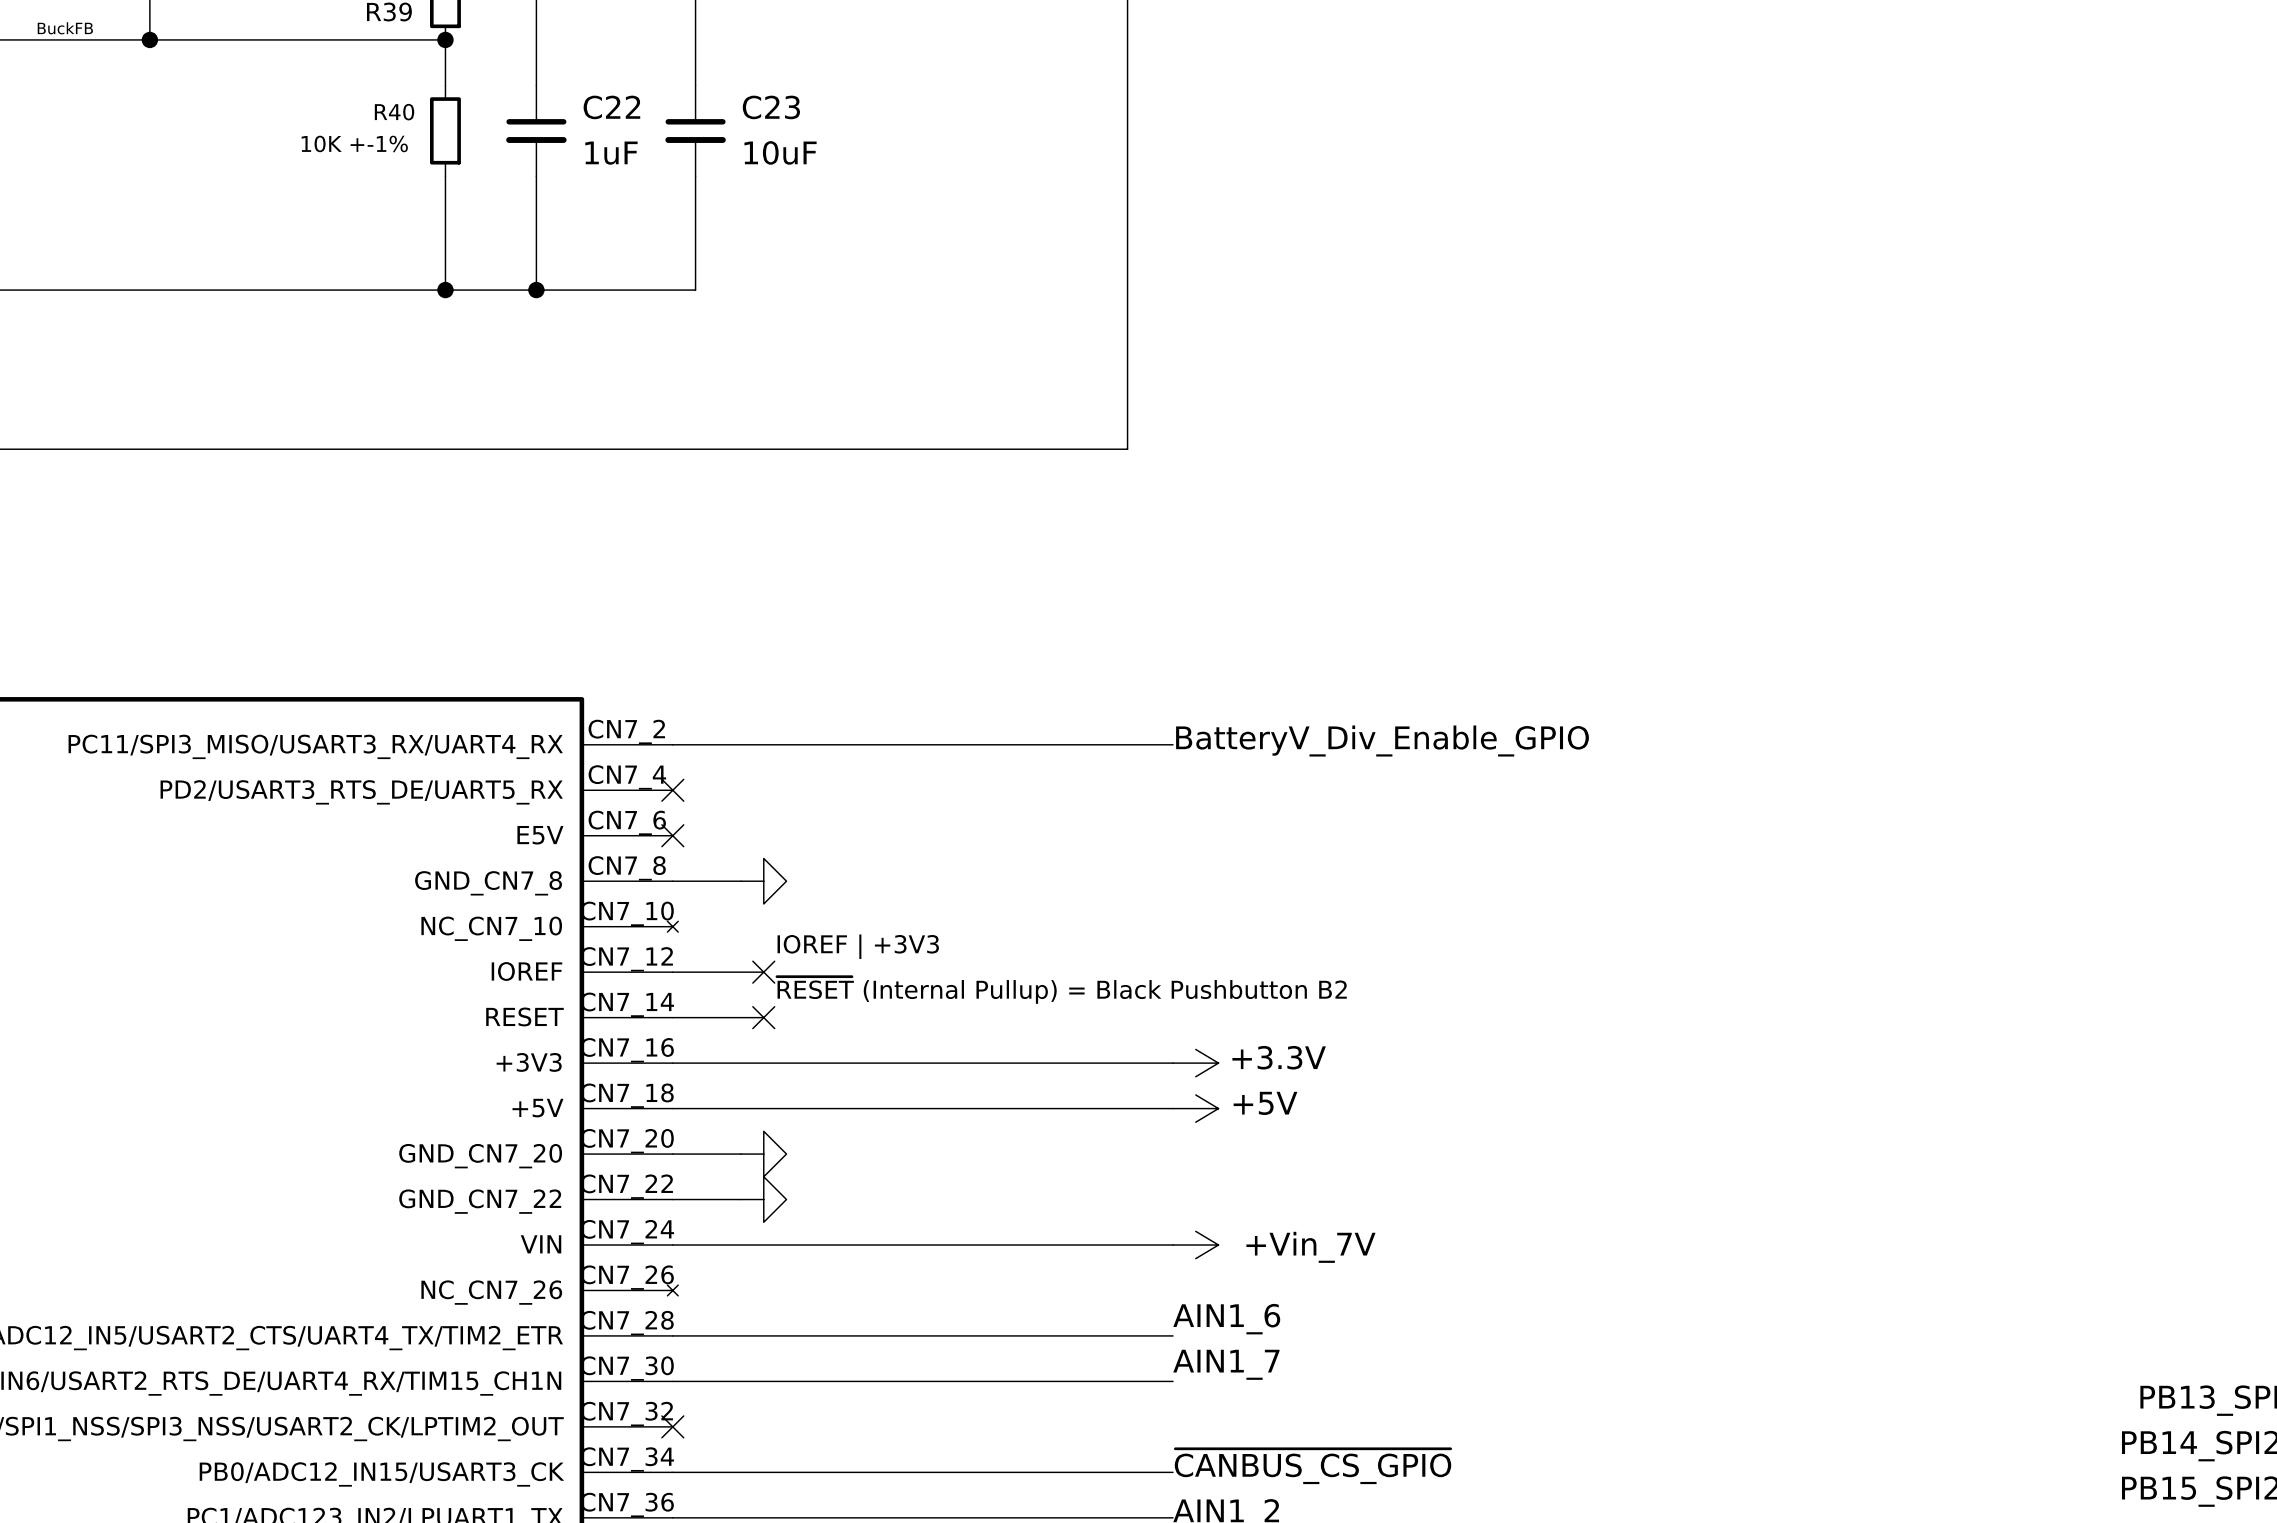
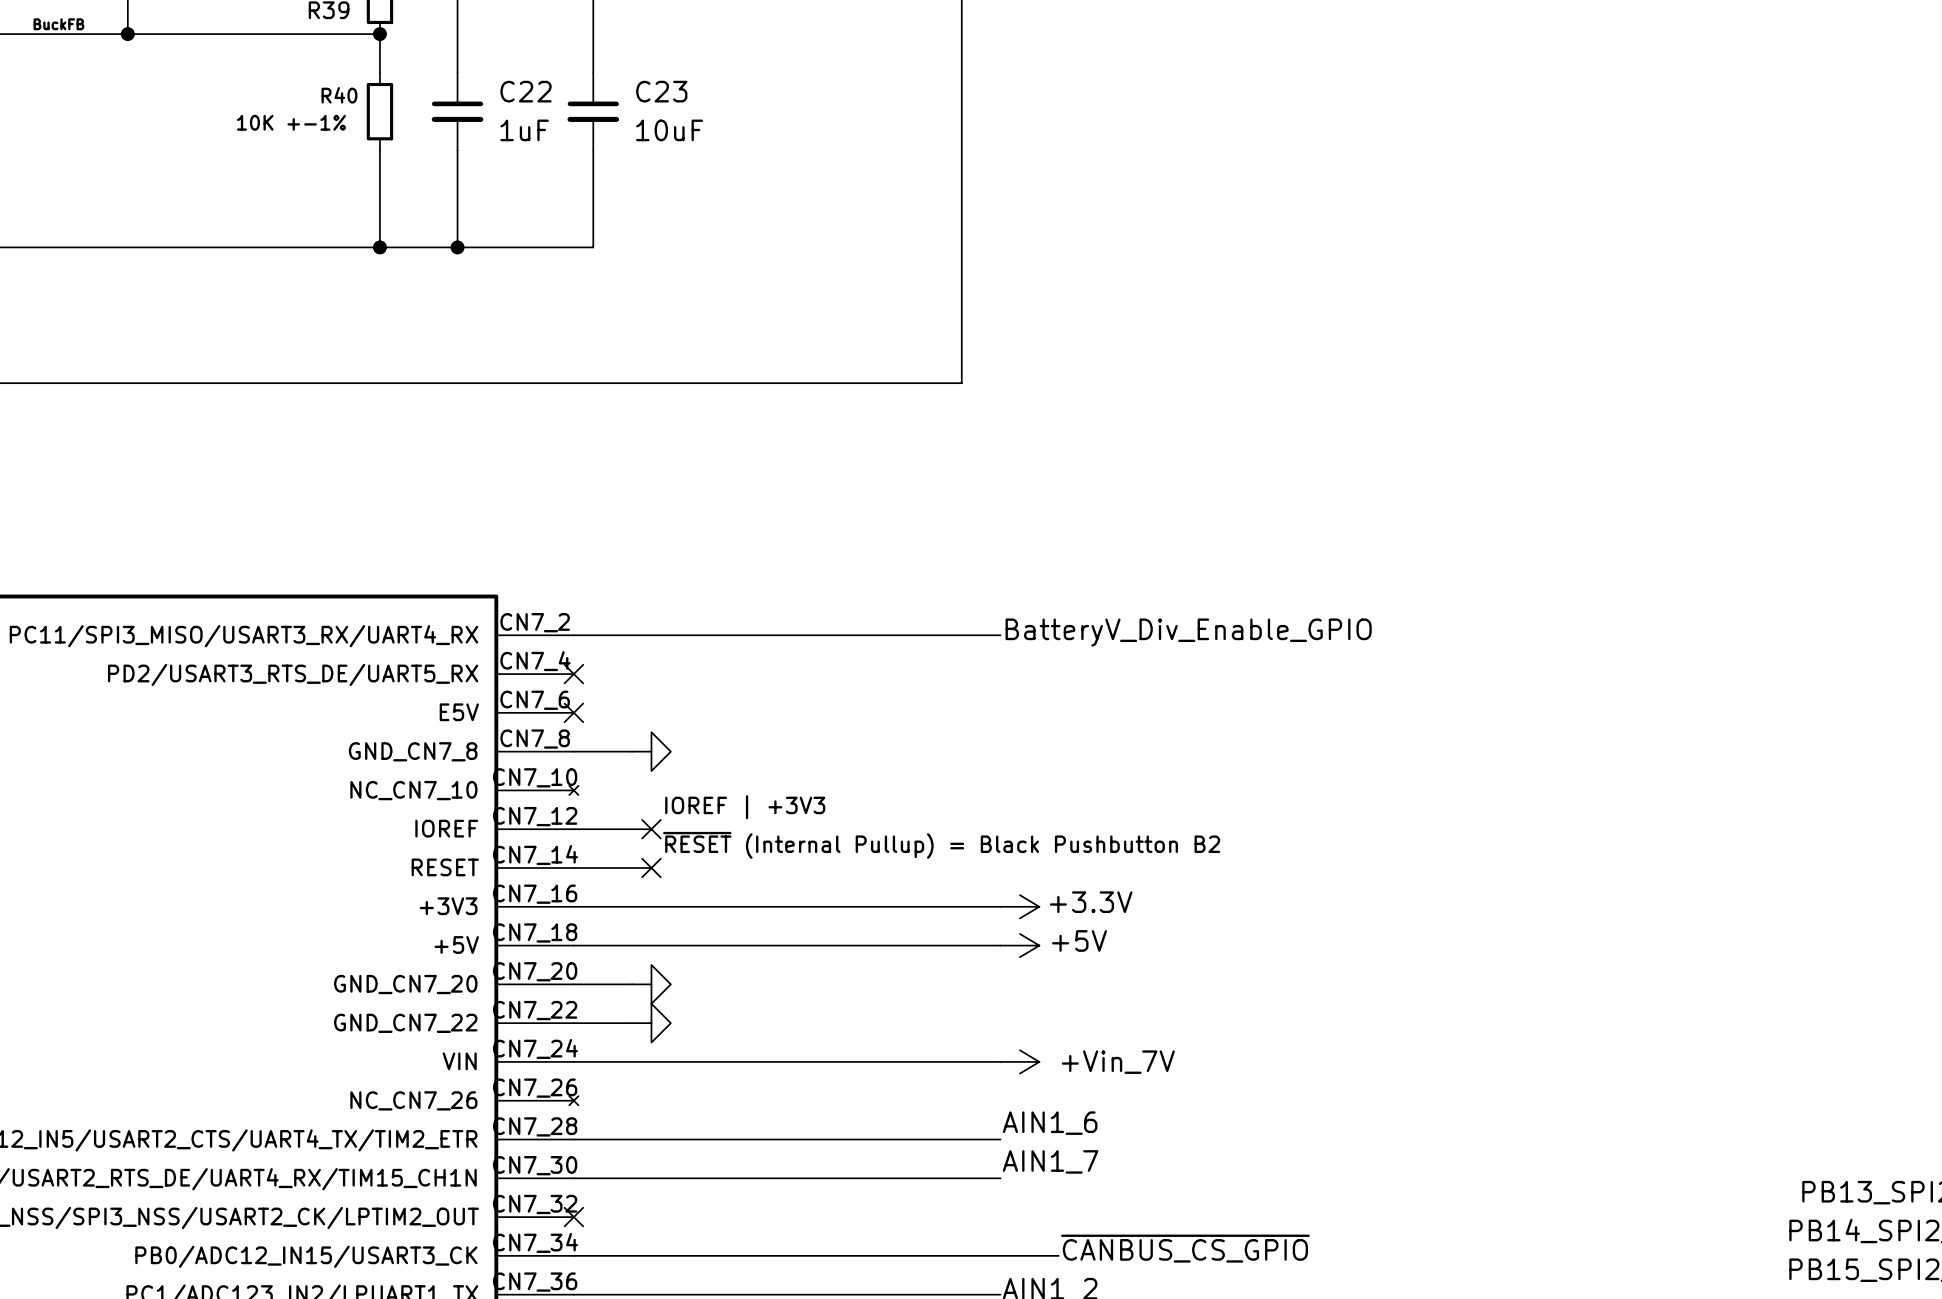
label position: ~{CANBUS_CS_GPIO} (1312, 1466) -> ~{CANBUS_CS_GPIO} (1185, 1248)
wire: none -> (1000, 1255) (1058, 1255)

